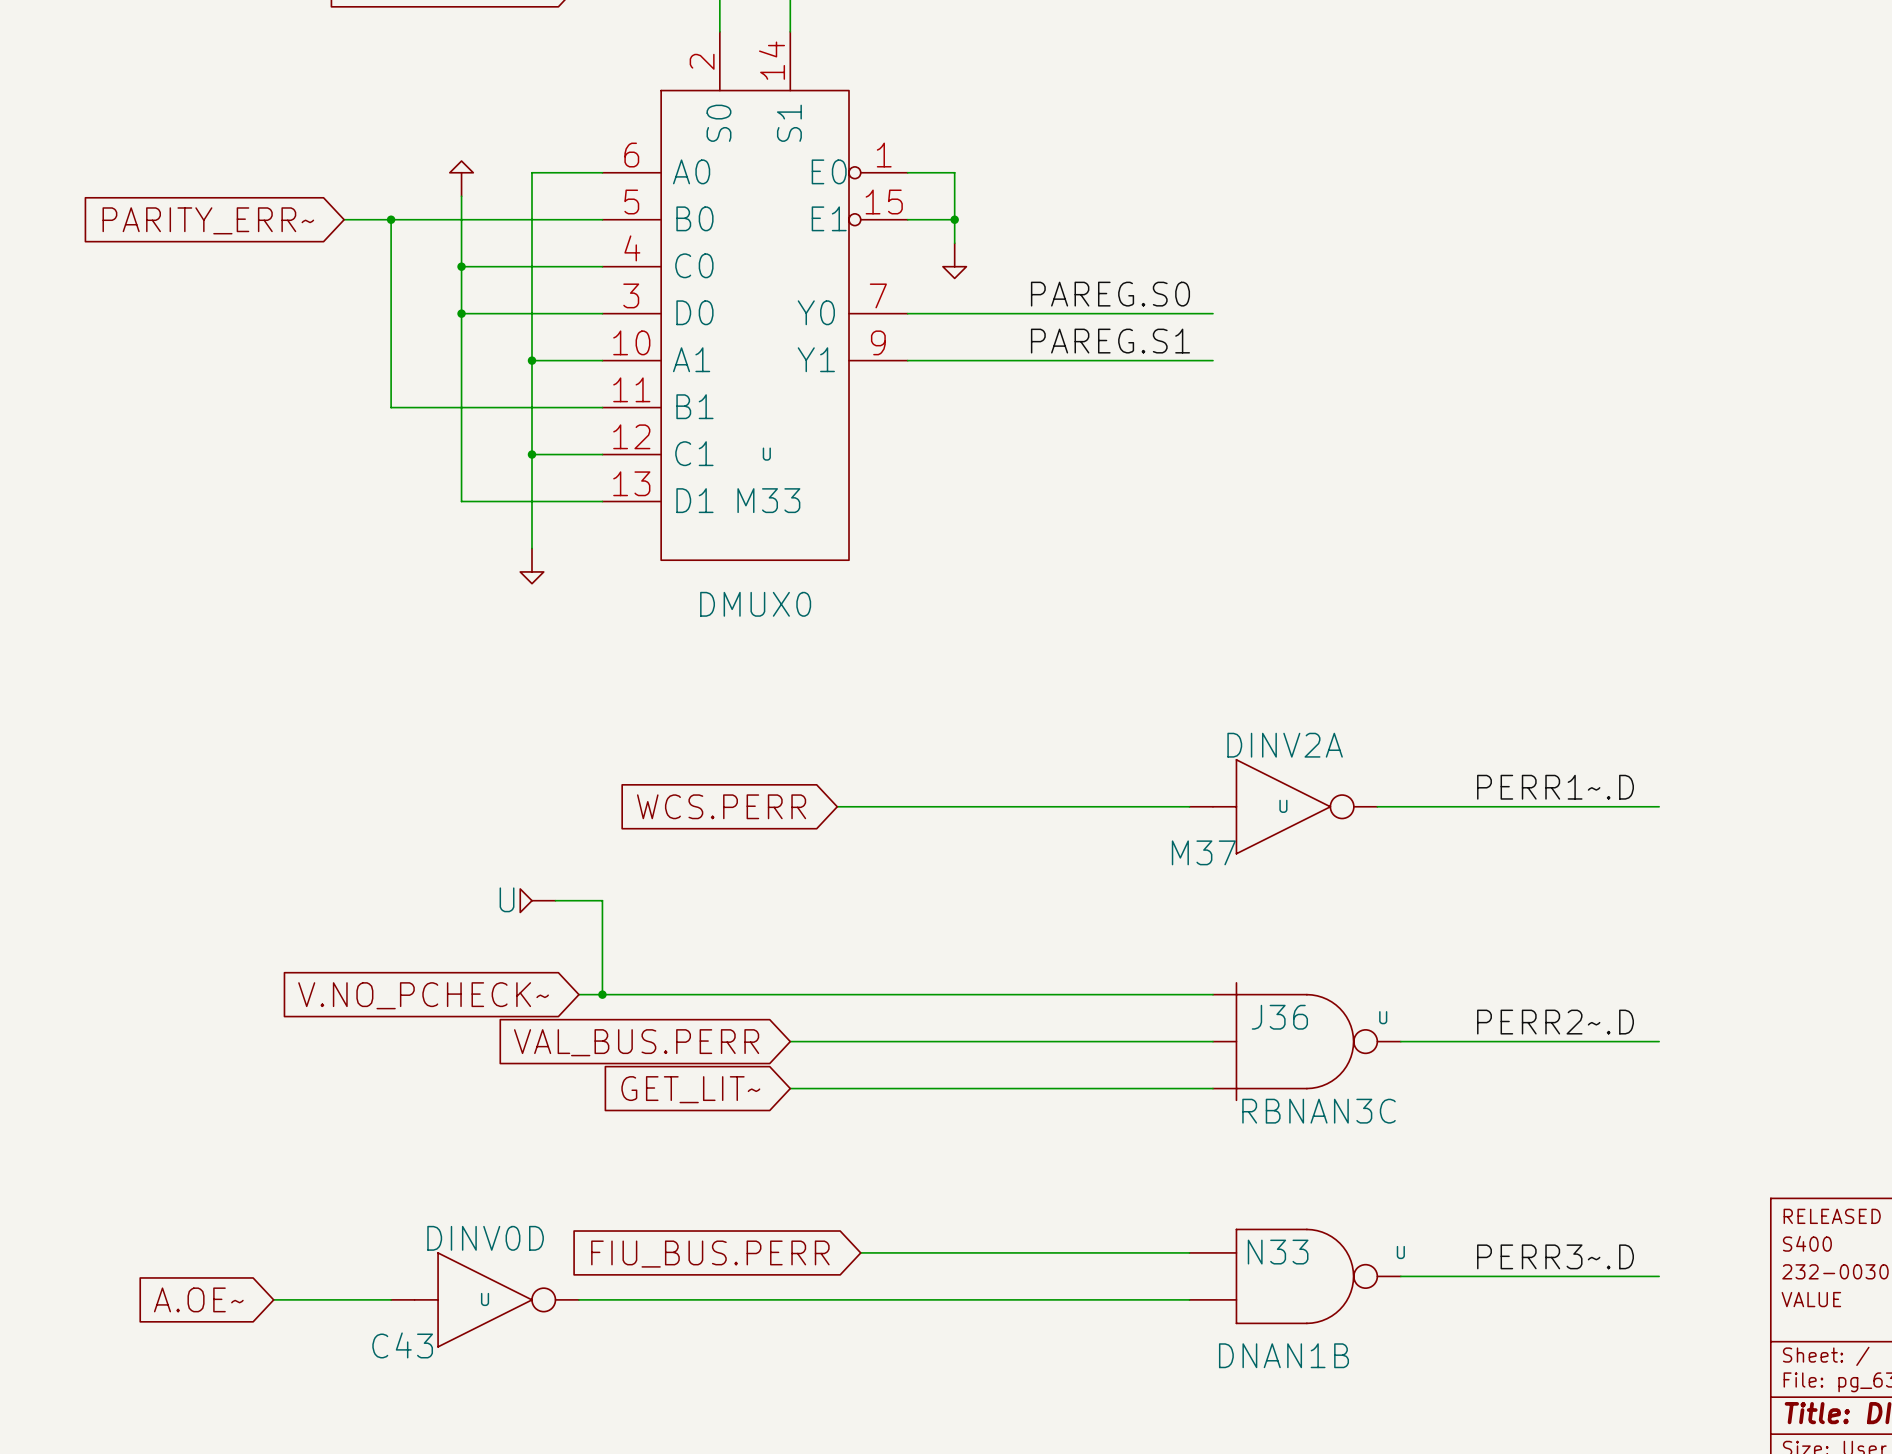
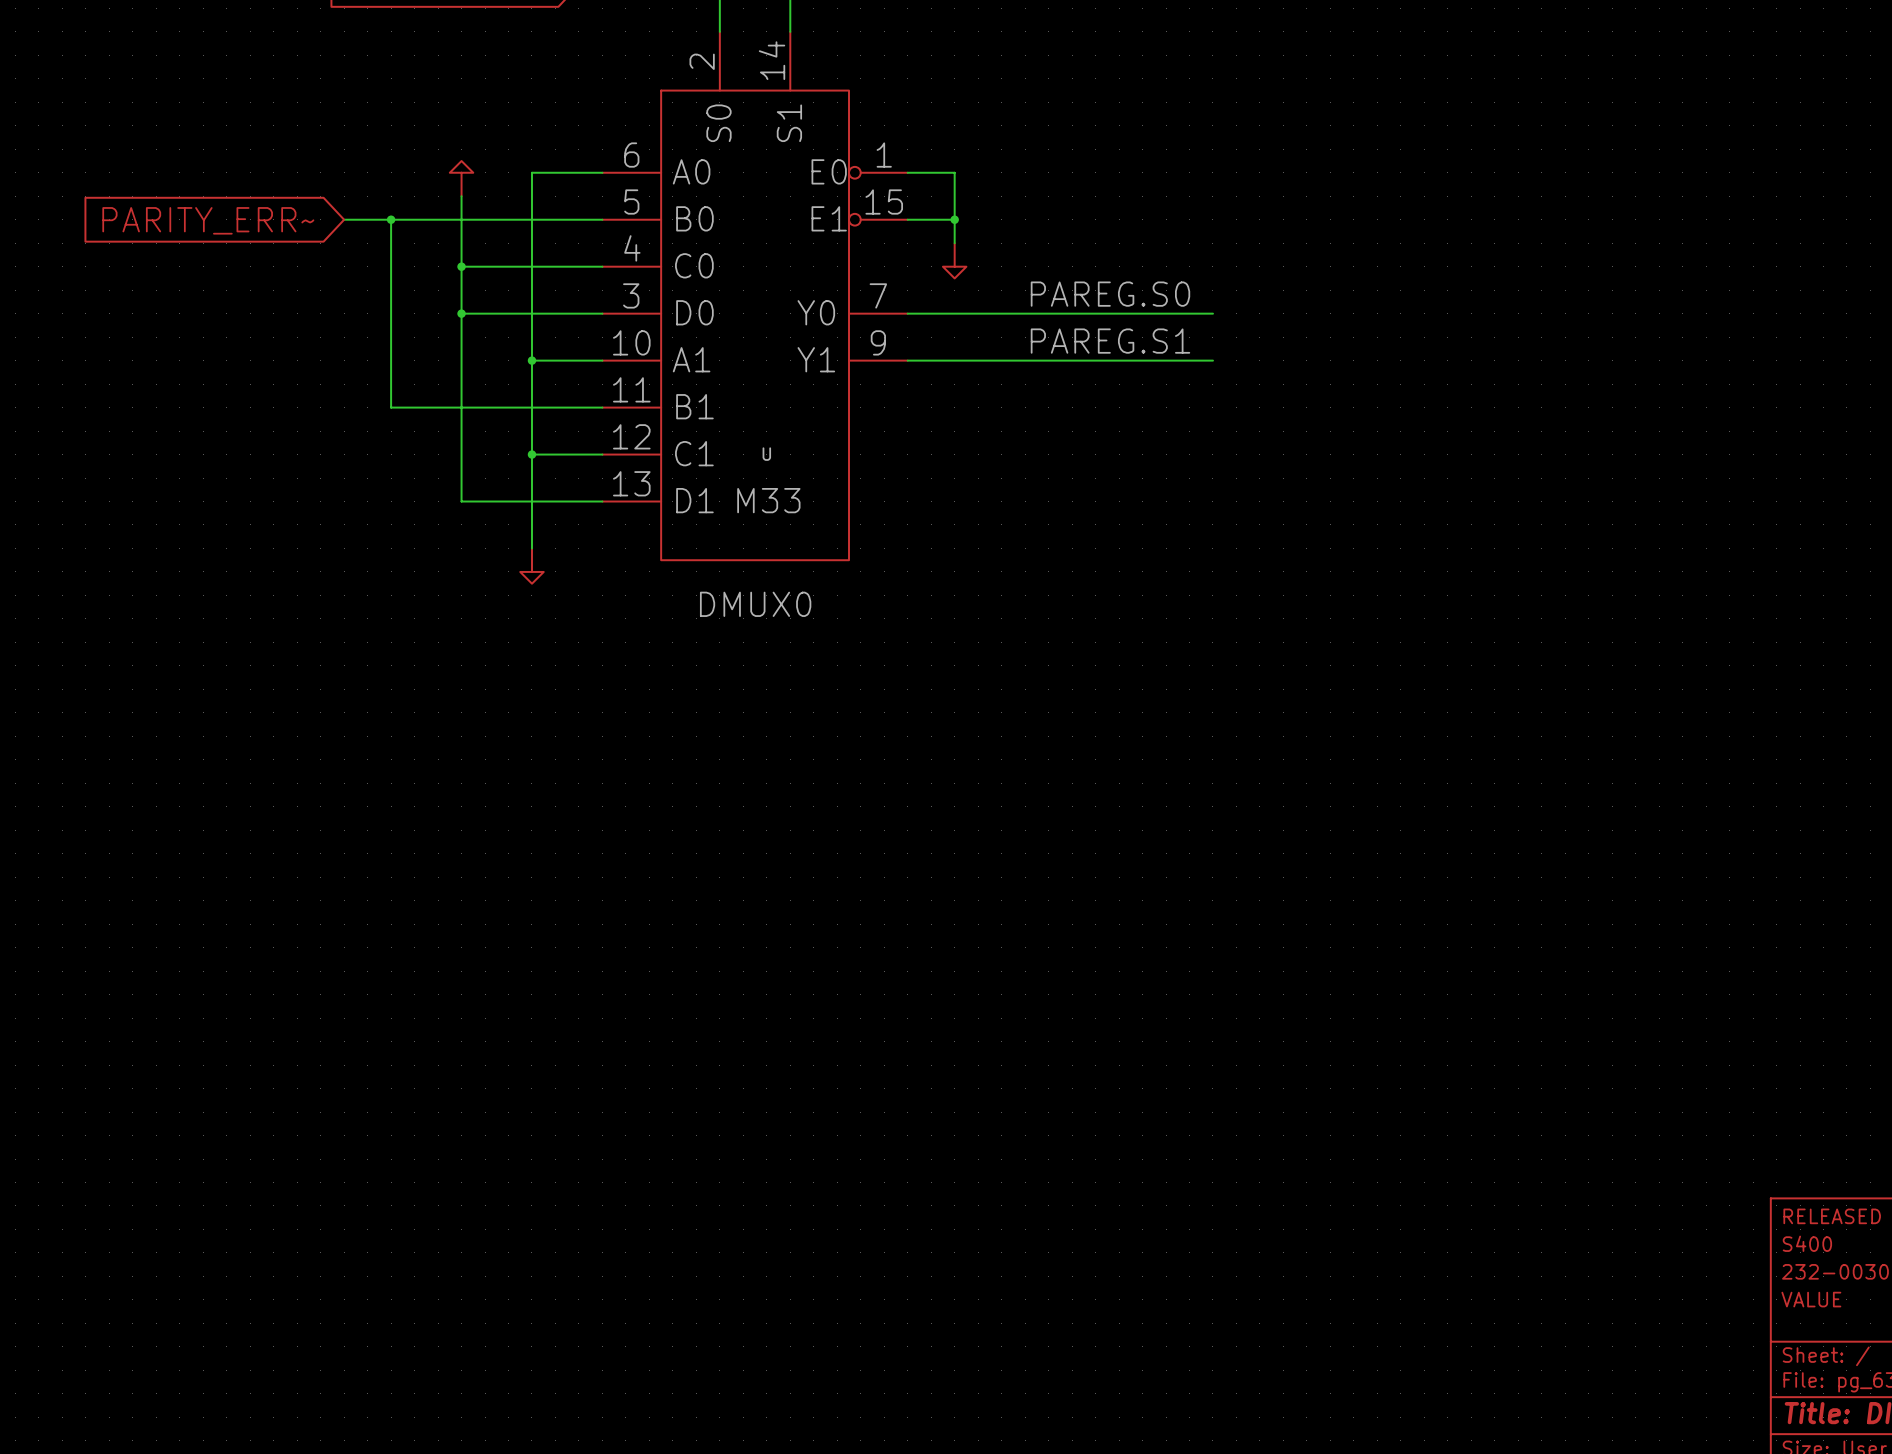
label: PERR1~.D (1555, 787) -> none
global label: WCS.PERR (721, 806) -> none
wire: (837, 806) (1189, 806) -> none
U: (1283, 806) -> none
wire: (1377, 806) (1659, 806) -> none
U: (537, 900) -> none
wire: (555, 900) (602, 900) (602, 994) -> none
wire: (578, 994) (1212, 994) -> none
junction: (602, 994) -> none
global label: V.NO_PCHECK~ (423, 995) -> none
label: PERR2~.D (1555, 1022) -> none
wire: (790, 1041) (1212, 1041) -> none
U: (1306, 1041) -> none
wire: (1400, 1041) (1659, 1041) -> none
global label: VAL_BUS.PERR (636, 1042) -> none
wire: (790, 1088) (1212, 1088) -> none
global label: GET_LIT~ (690, 1089) -> none
wire: (860, 1252) (1189, 1252) -> none
global label: FIU_BUS.PERR (710, 1254) -> none
label: PERR3~.D (1555, 1256) -> none
U: (1295, 1276) -> none
wire: (1400, 1276) (1659, 1276) -> none
global label: A.OE~ (198, 1299) -> none
wire: (273, 1299) (391, 1299) -> none
U: (485, 1299) -> none
wire: (578, 1299) (1189, 1299) -> none

